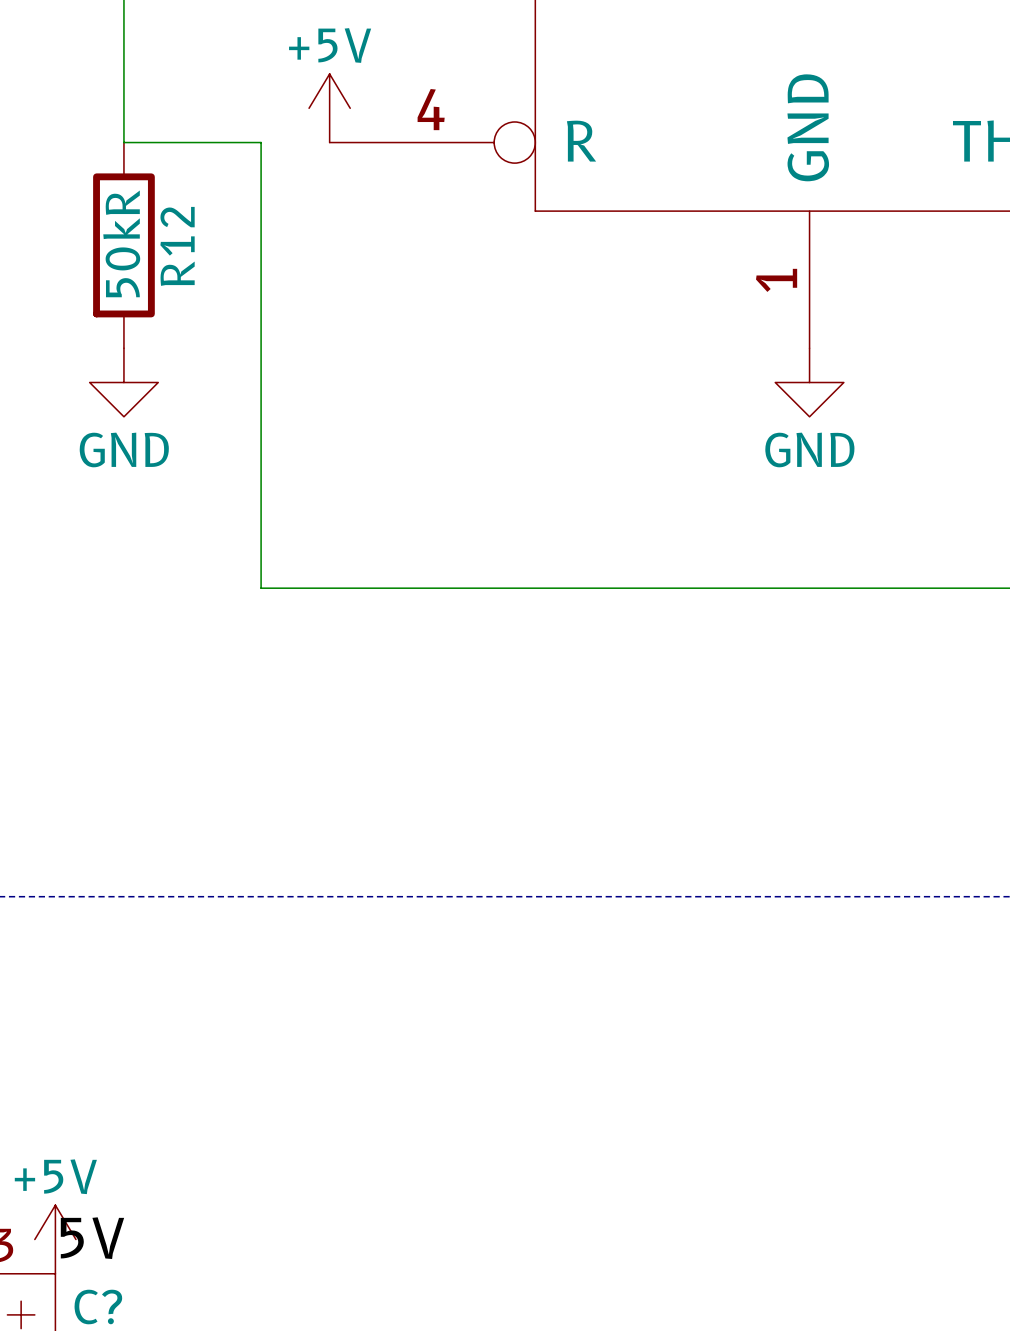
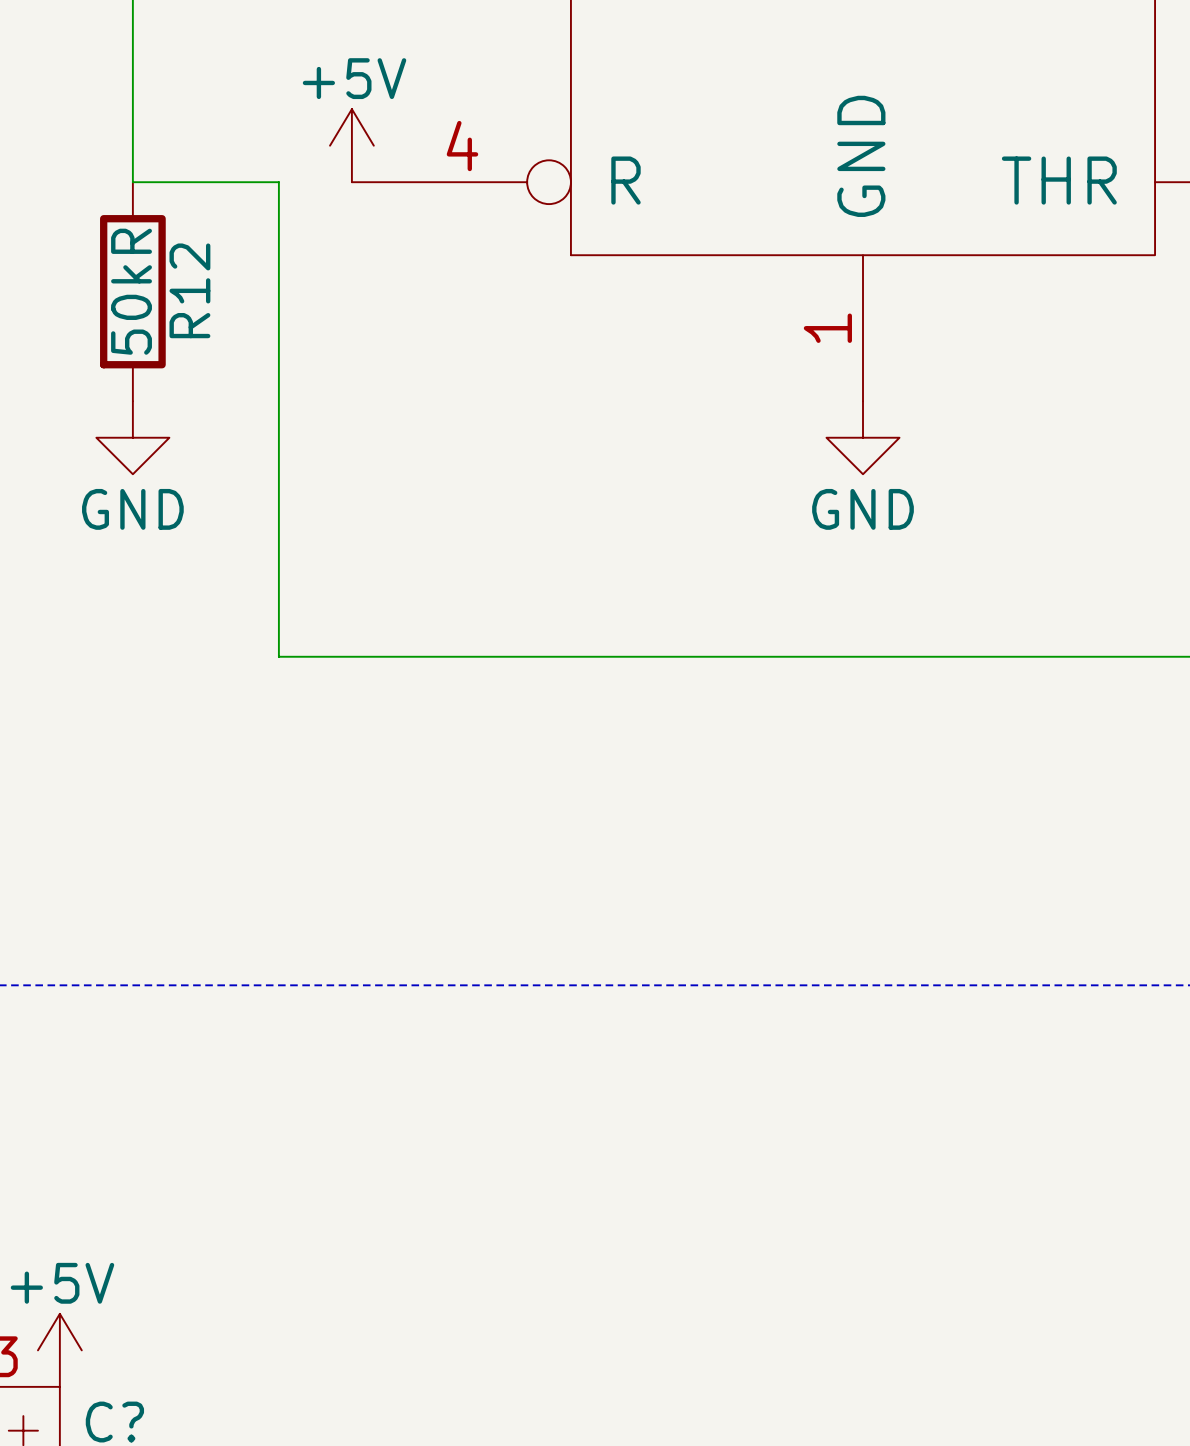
label: 5V (92, 1238) -> none

